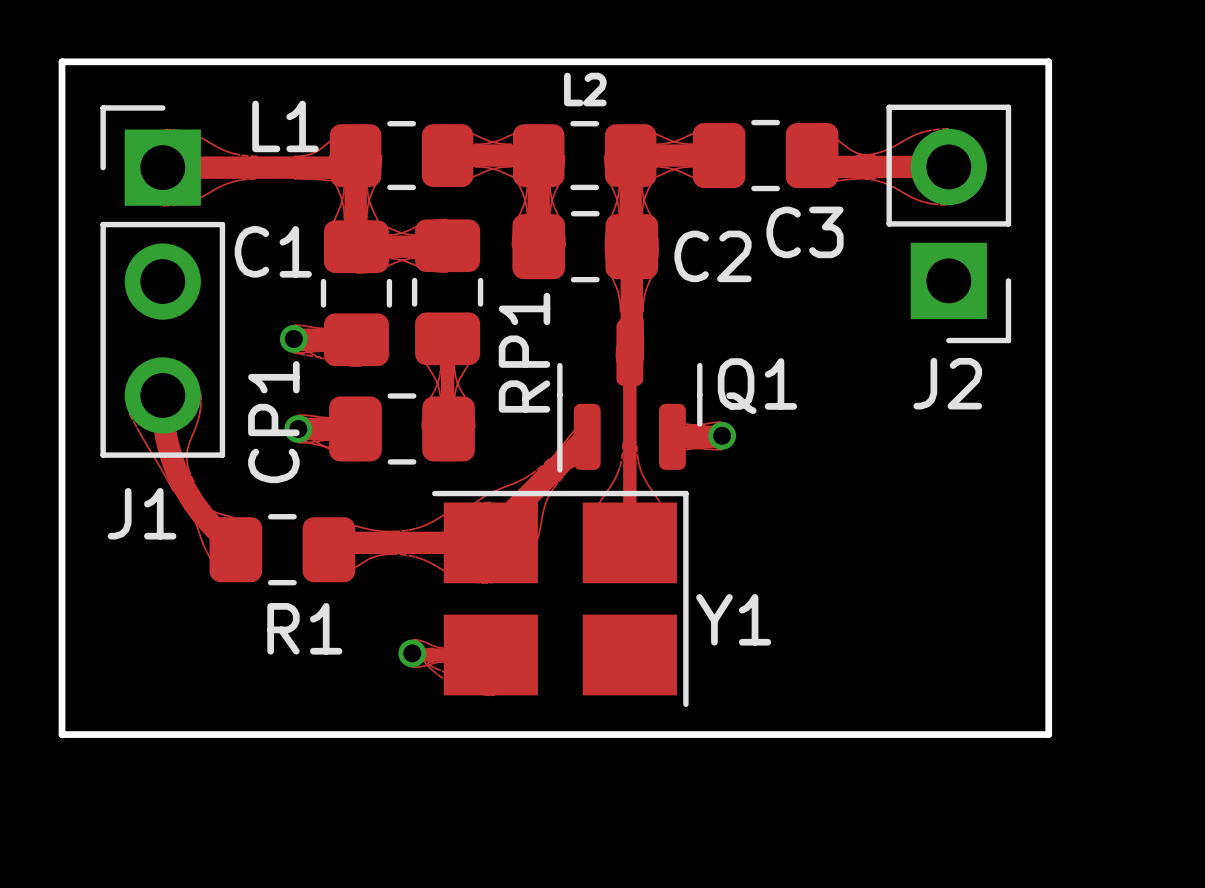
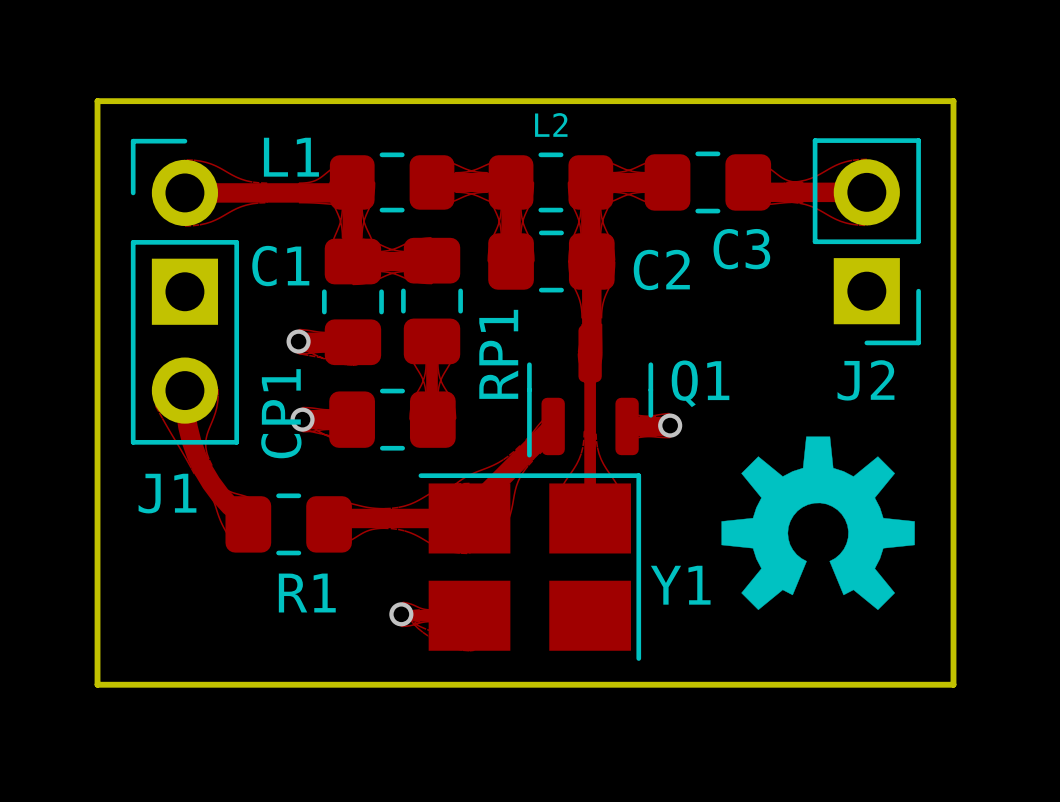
J1 footprint: [100, 105, 226, 458] -> [130, 138, 240, 445]
drawing: none -> [721, 436, 915, 610]

